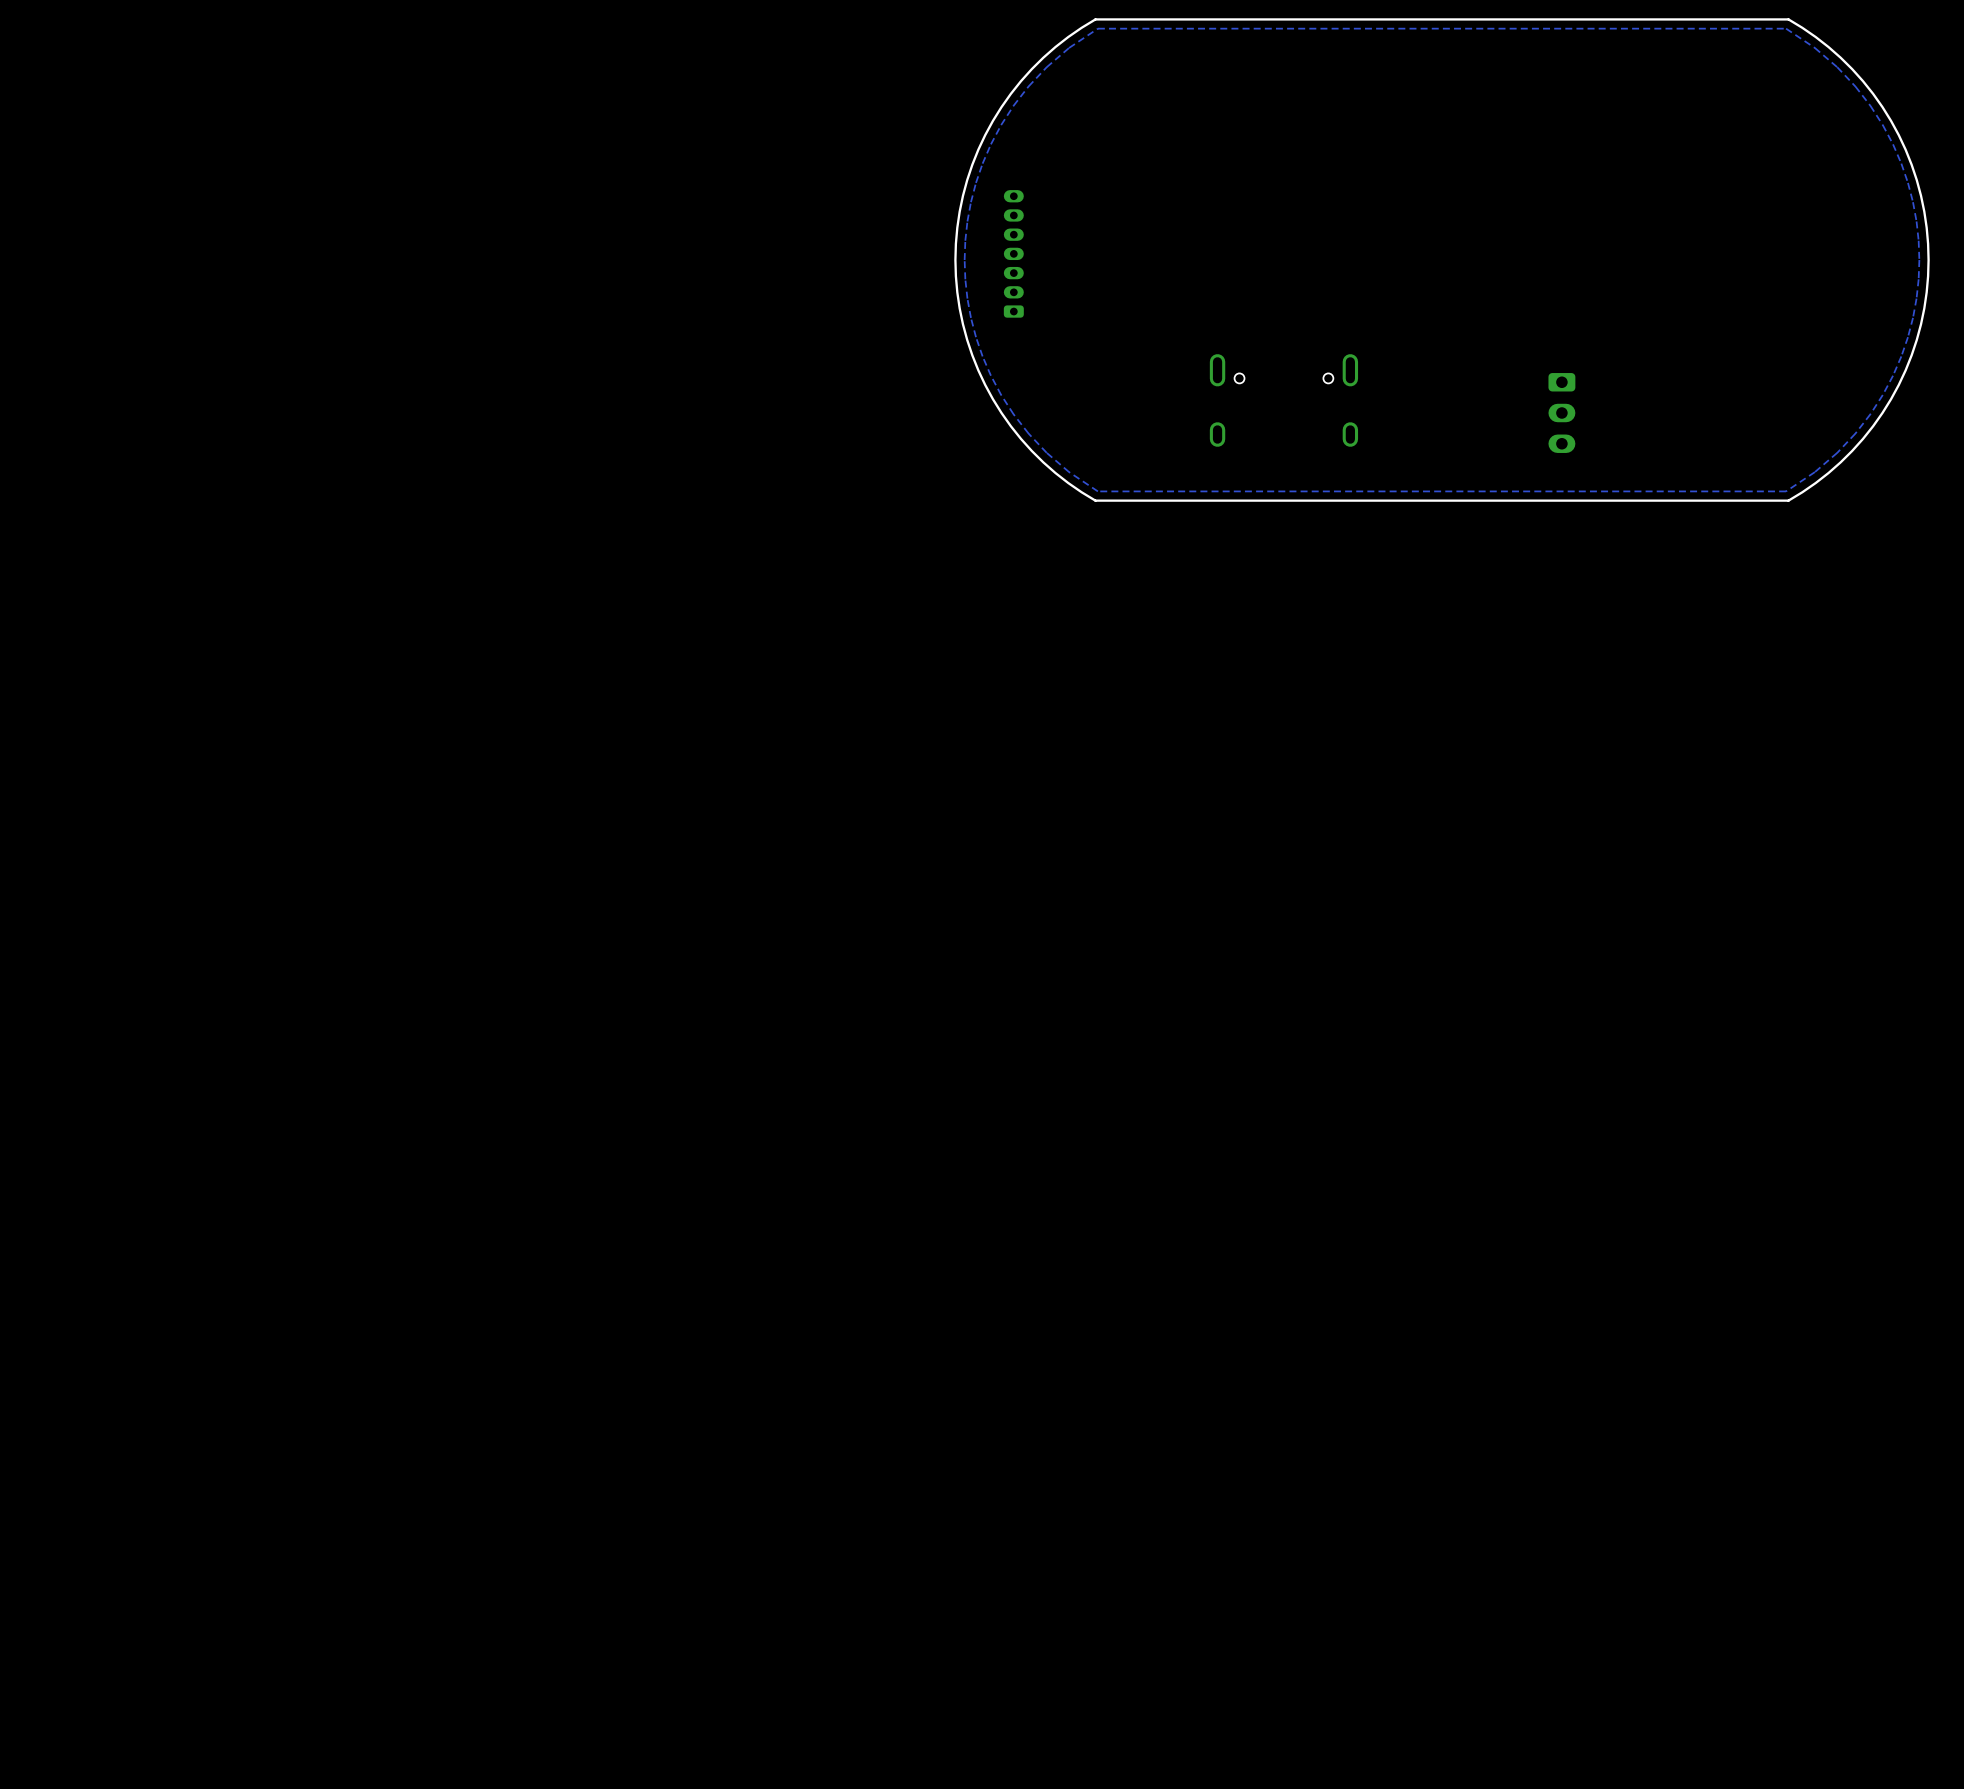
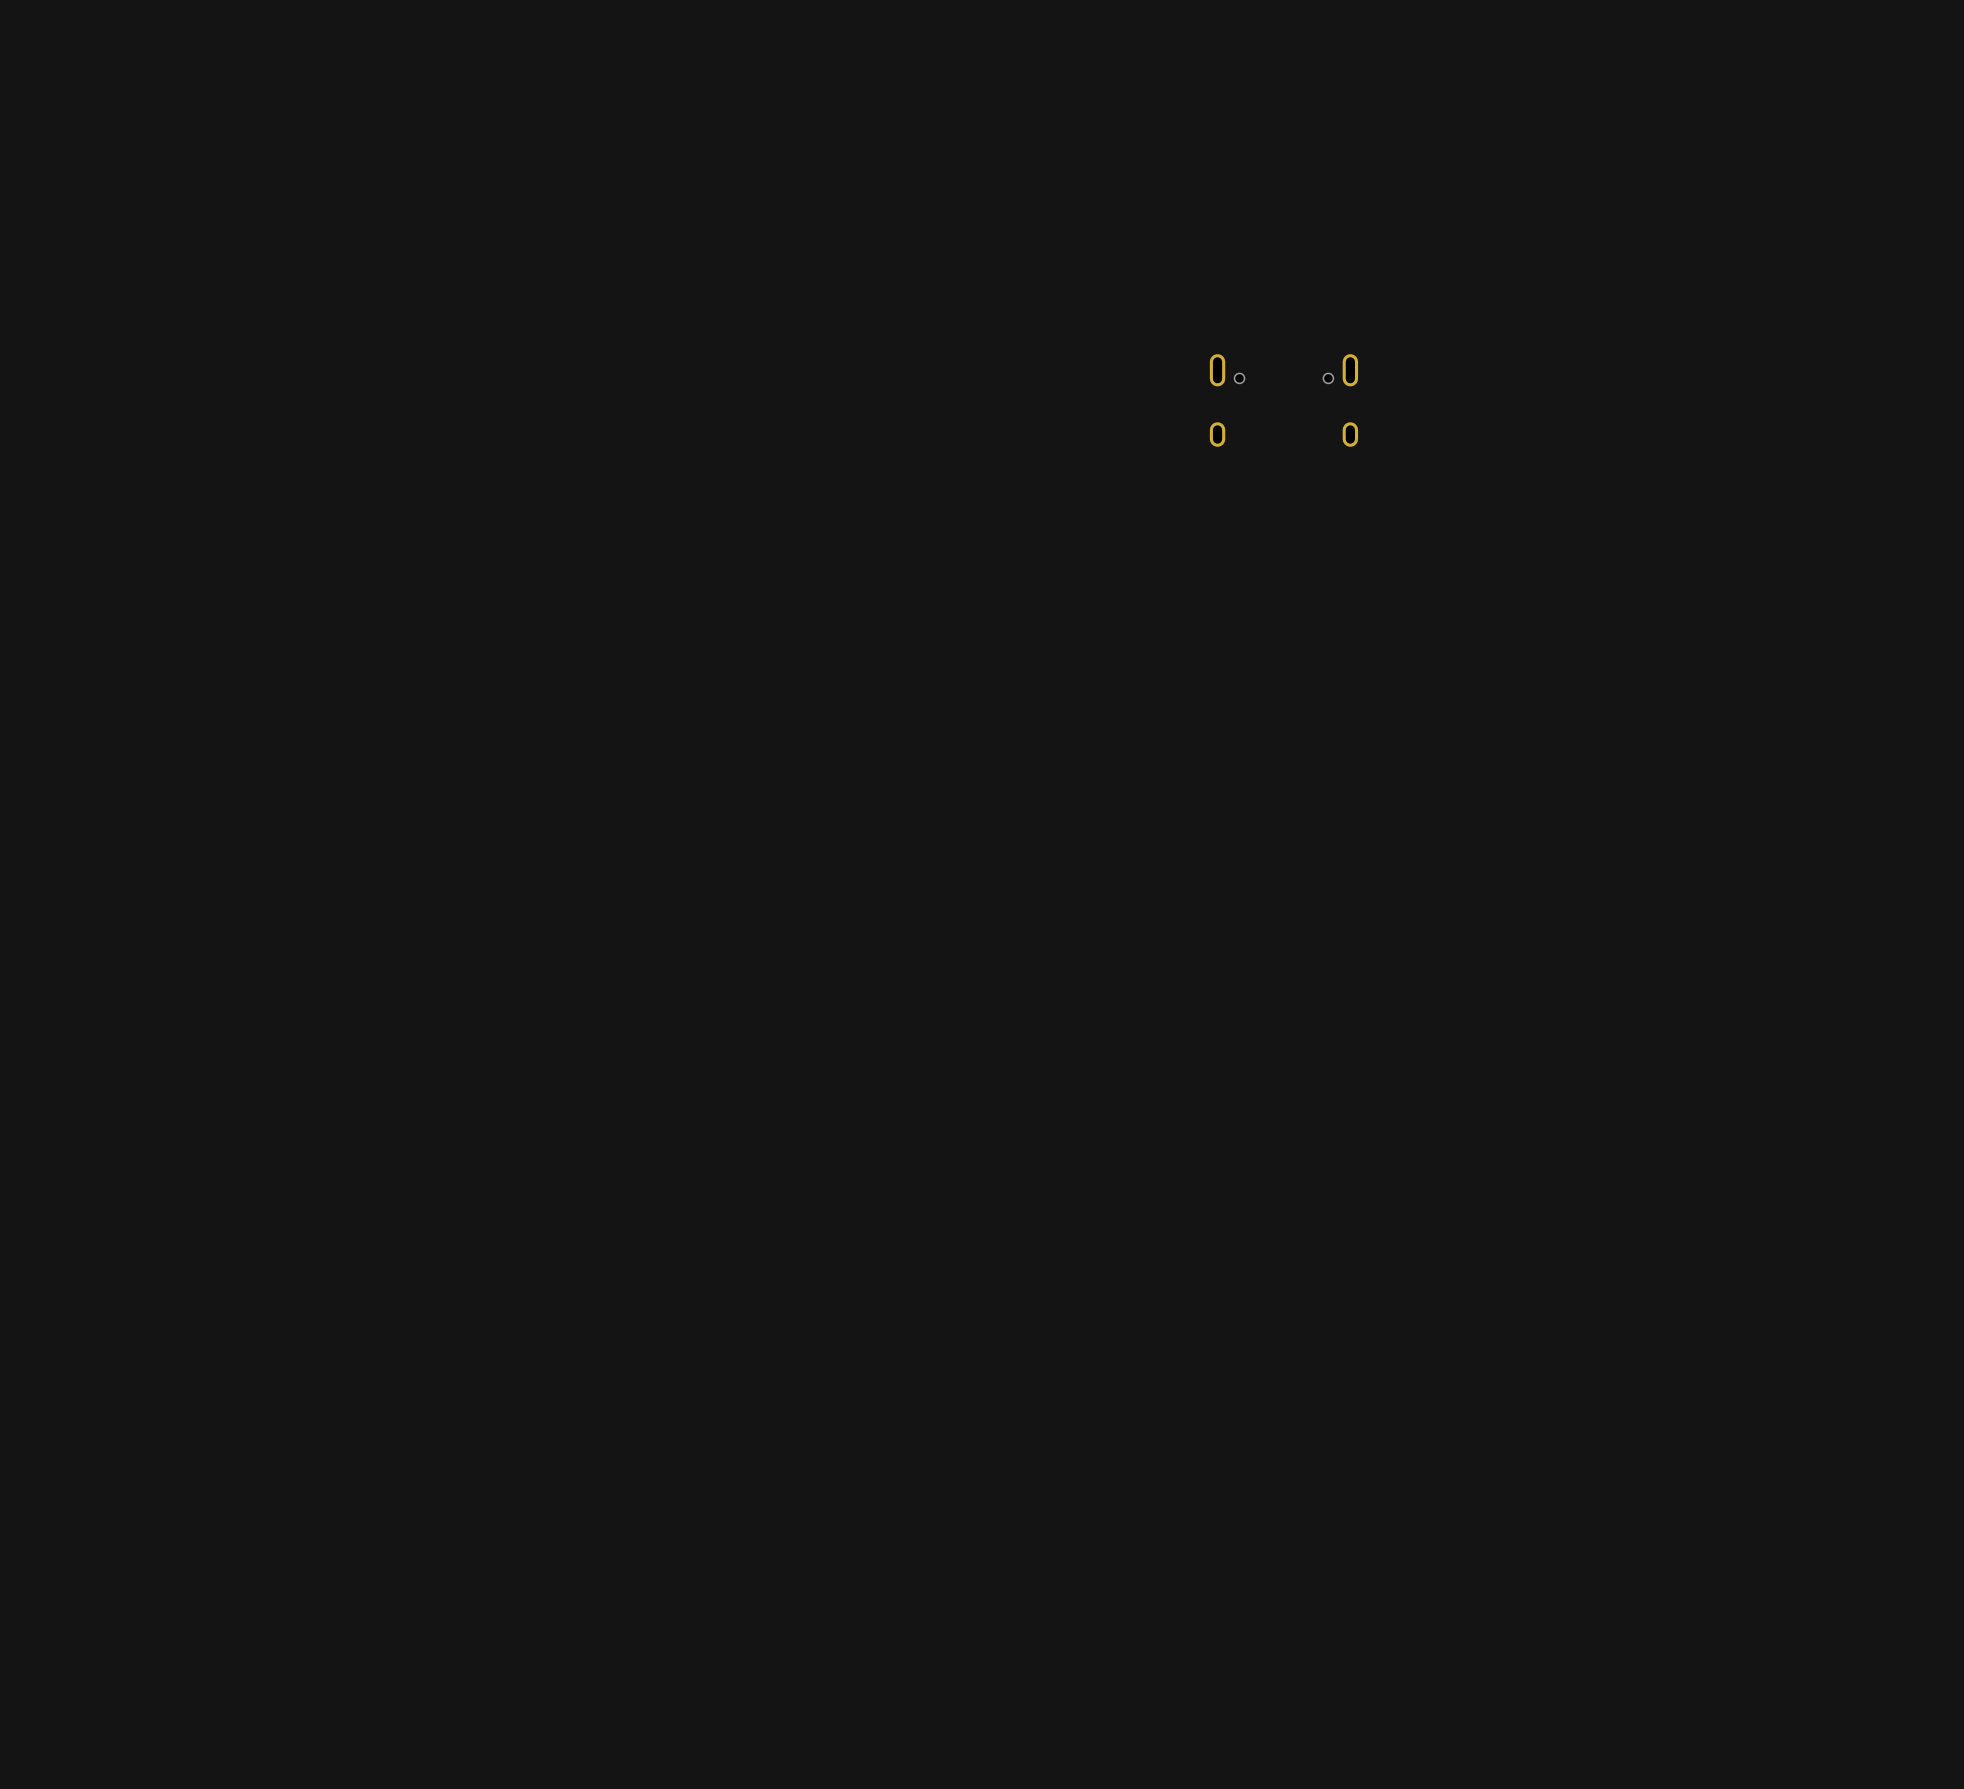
board edge: (1788, 19) (1095, 19) (1055, 47) (1020, 81) (992, 120) (972, 164) (962, 195) (957, 227) (955, 276) (962, 324) (978, 370) (1001, 412) (1031, 450) (1068, 483) (1095, 500) (1788, 500) (1815, 483) (1840, 462) (1863, 438) (1891, 399) (1905, 370) (1916, 339) (1926, 292) (1928, 260) (1926, 227) (1916, 180) (1905, 149) (1891, 120) (1873, 93) (1840, 57) (1815, 37) (1788, 19) -> none
zone outline: (1786, 28) (1814, 47) (1837, 67) (1855, 86) (1882, 125) (1893, 144) (1907, 182) (1916, 221) (1919, 260) (1916, 298) (1907, 337) (1893, 375) (1882, 395) (1855, 433) (1837, 452) (1814, 472) (1786, 491) (1097, 491) (1069, 472) (1028, 433) (1001, 395) (982, 356) (970, 317) (964, 260) (970, 202) (982, 163) (1001, 125) (1028, 86) (1069, 47) (1097, 28) (1786, 28) -> none
part: (1013, 253) -> none
part: (1561, 413) -> none

